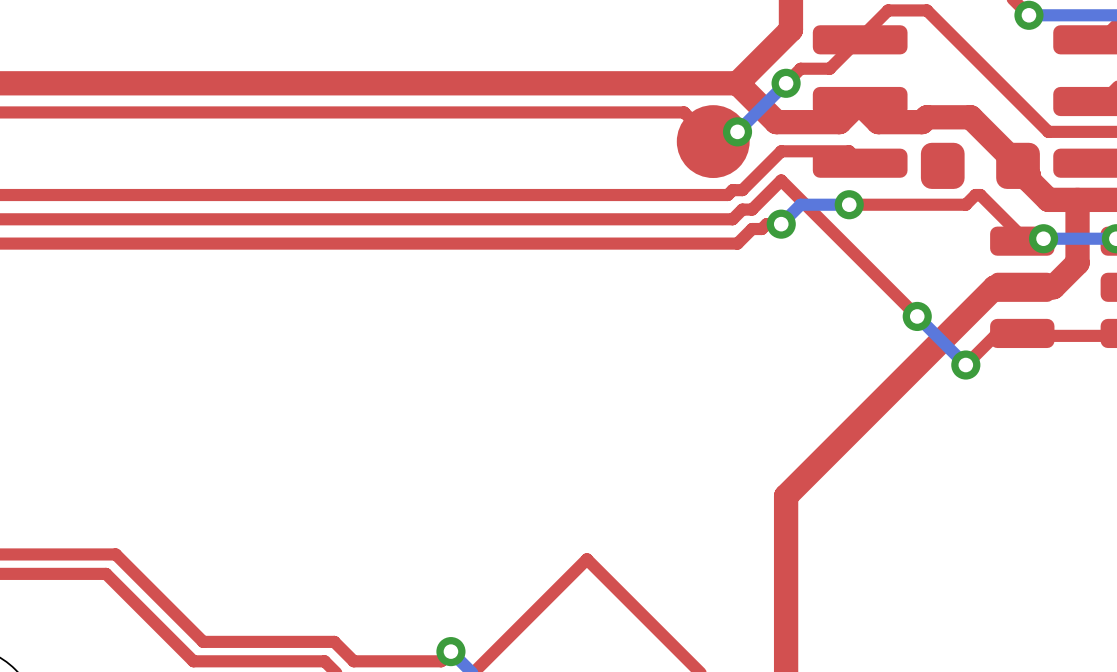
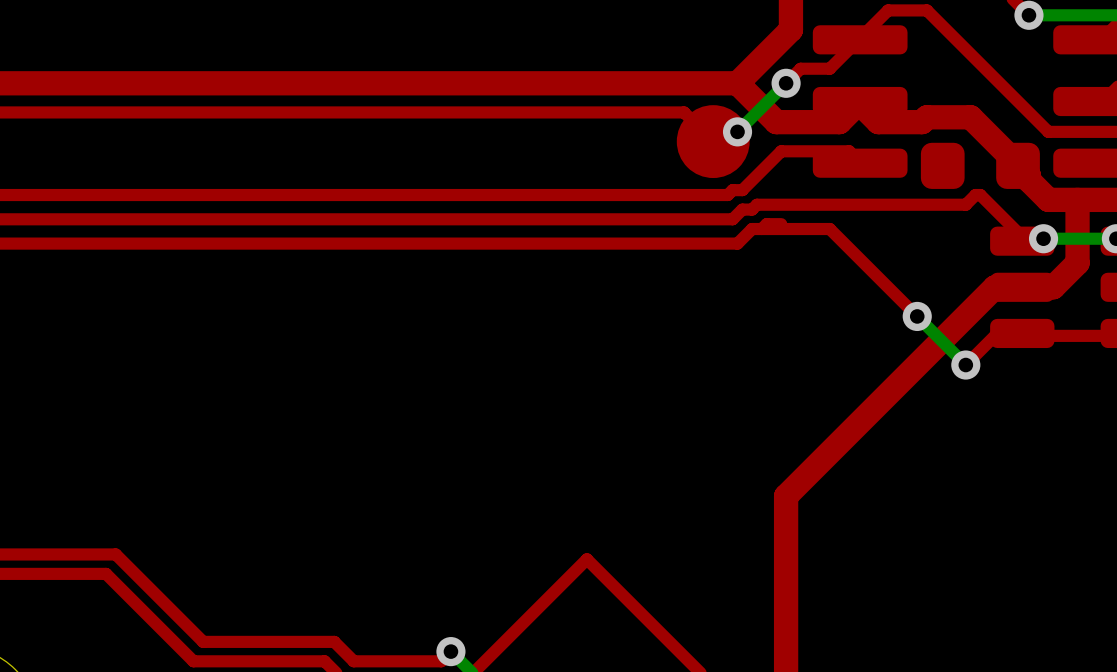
top track: (756, 204) (781, 180) (829, 229) -> (761, 229) (829, 229)
top track: none -> (849, 204) (756, 204)
bottom track: (849, 204) (800, 204) (781, 224) -> none
via: (849, 204) -> none
via: (781, 224) -> none

